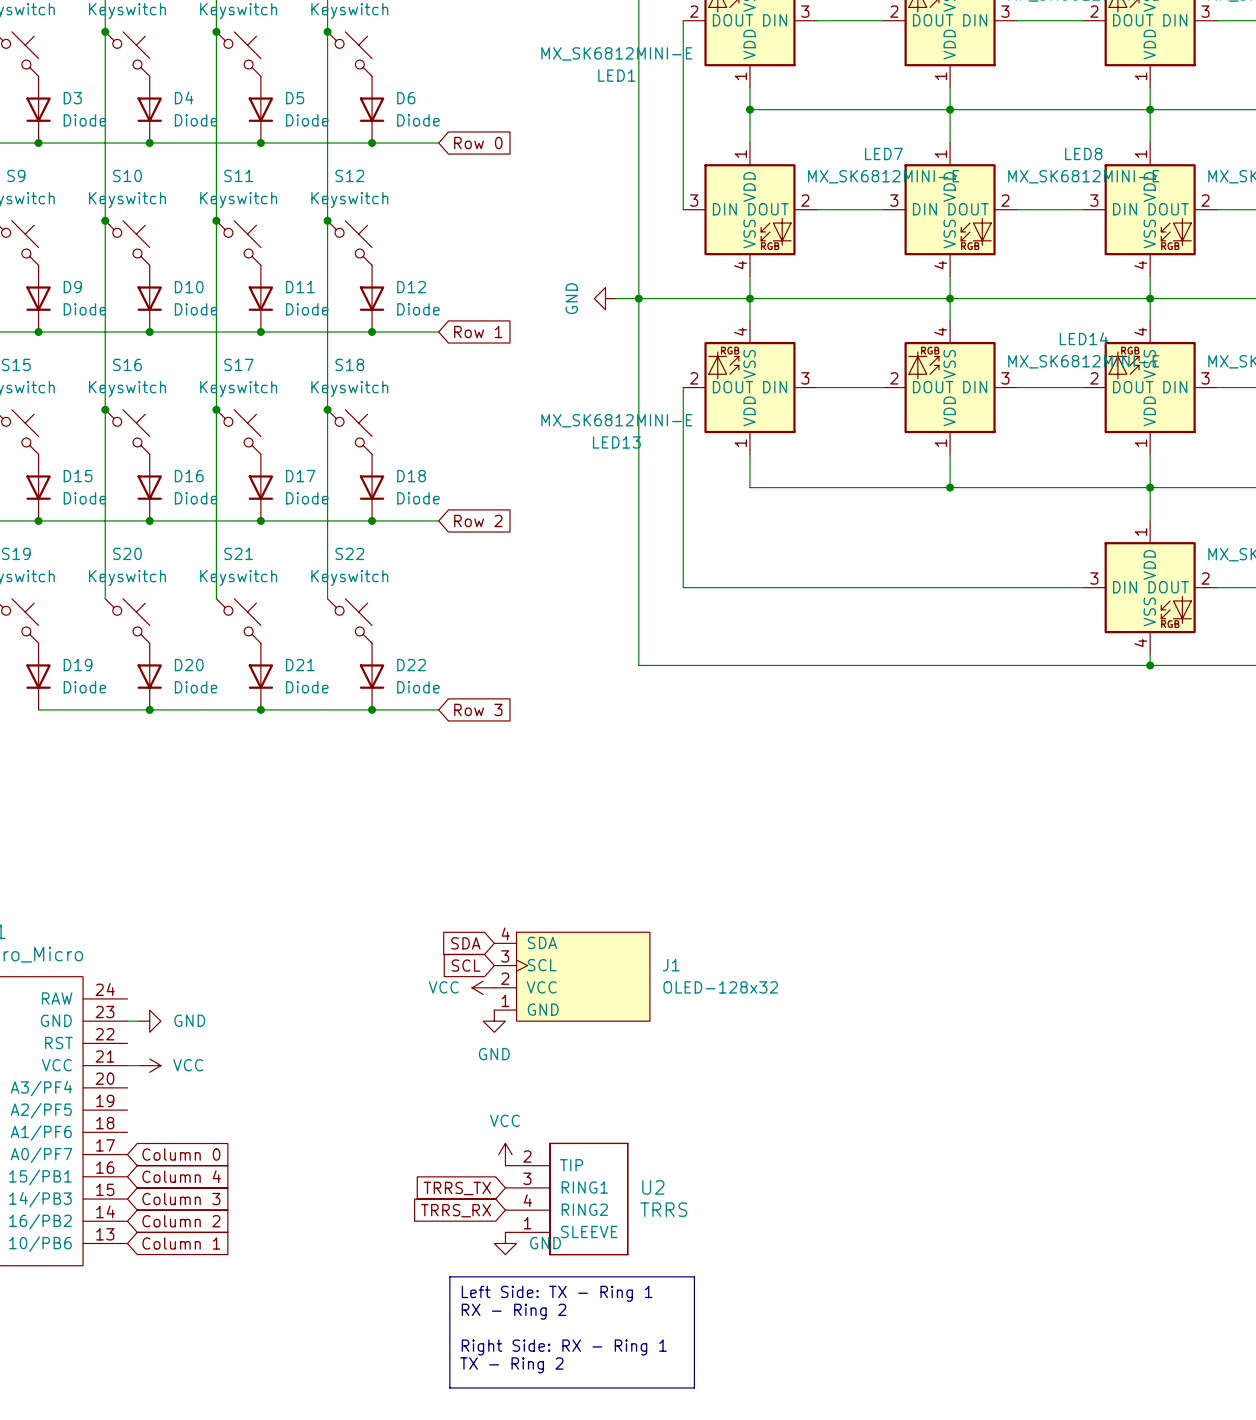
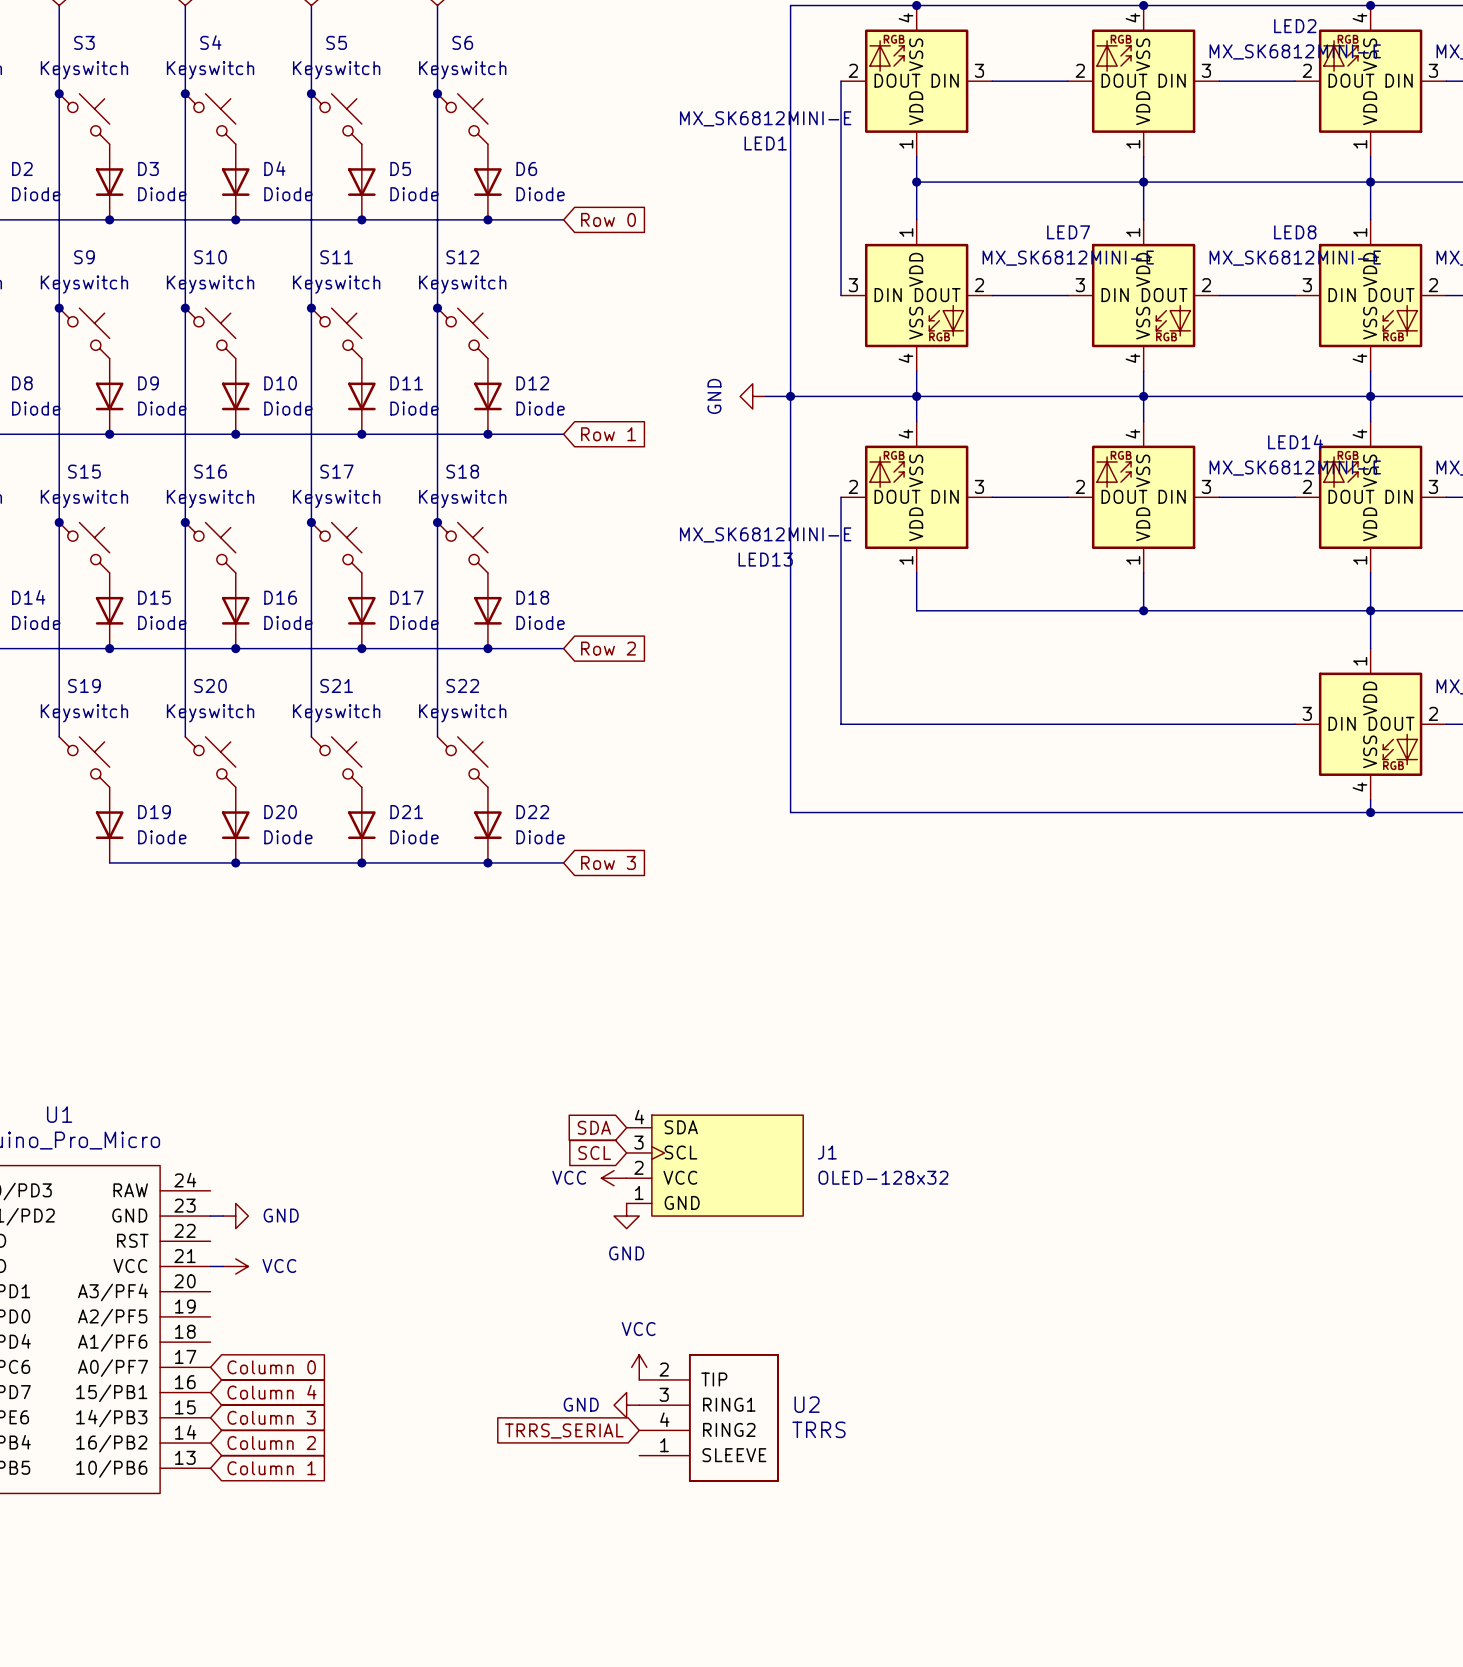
global label: TRRS_TX (457, 1188) -> none
global label: TRRS_RX (456, 1210) -> TRRS_SERIAL (564, 1431)
power symbol rotation: 0° (505, 1243) -> 90° clockwise (626, 1405)
power symbol position: GND (505, 1243) -> GND (626, 1405)
power symbol text position: GND (545, 1243) -> GND (581, 1404)
line: (449, 1276) (694, 1276) (694, 1388) (449, 1388) (449, 1276) -> none
text: Left Side: TX - Ring 1 (557, 1293) -> none
text: RX - Ring 2 (513, 1311) -> none
text: Right Side: RX - Ring 1 (564, 1347) -> none
text: TX - Ring 2 (511, 1365) -> none

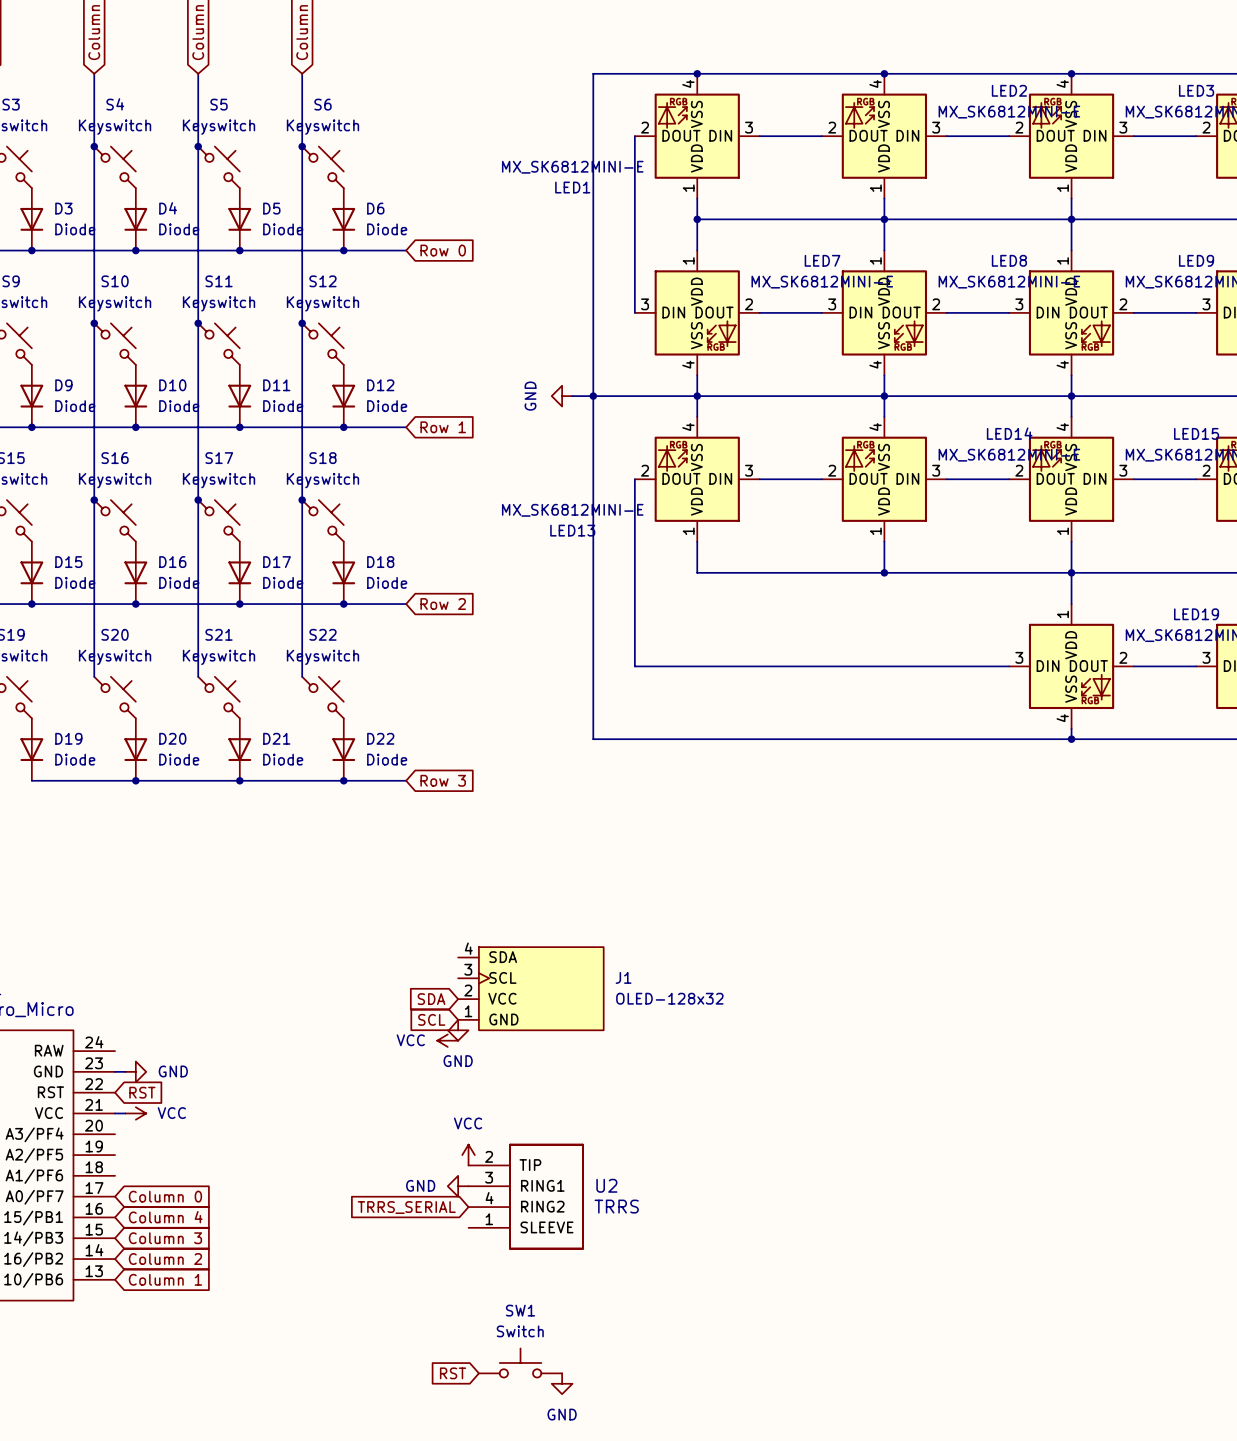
J1 position: (714, 1165) -> (530, 988)
power symbol position: GND (626, 1216) -> GND (458, 1030)
global label: none -> RST (142, 1092)
power symbol position: VCC (639, 1367) -> VCC (468, 1155)
power symbol position: GND (626, 1405) -> GND (458, 1186)
U2 position: (708, 1417) -> (525, 1196)
global label position: TRRS_SERIAL (564, 1431) -> TRRS_SERIAL (406, 1207)
SW1: none -> Switch (520, 1362)
global label: none -> RST (453, 1373)
power symbol: none -> GND (562, 1383)

